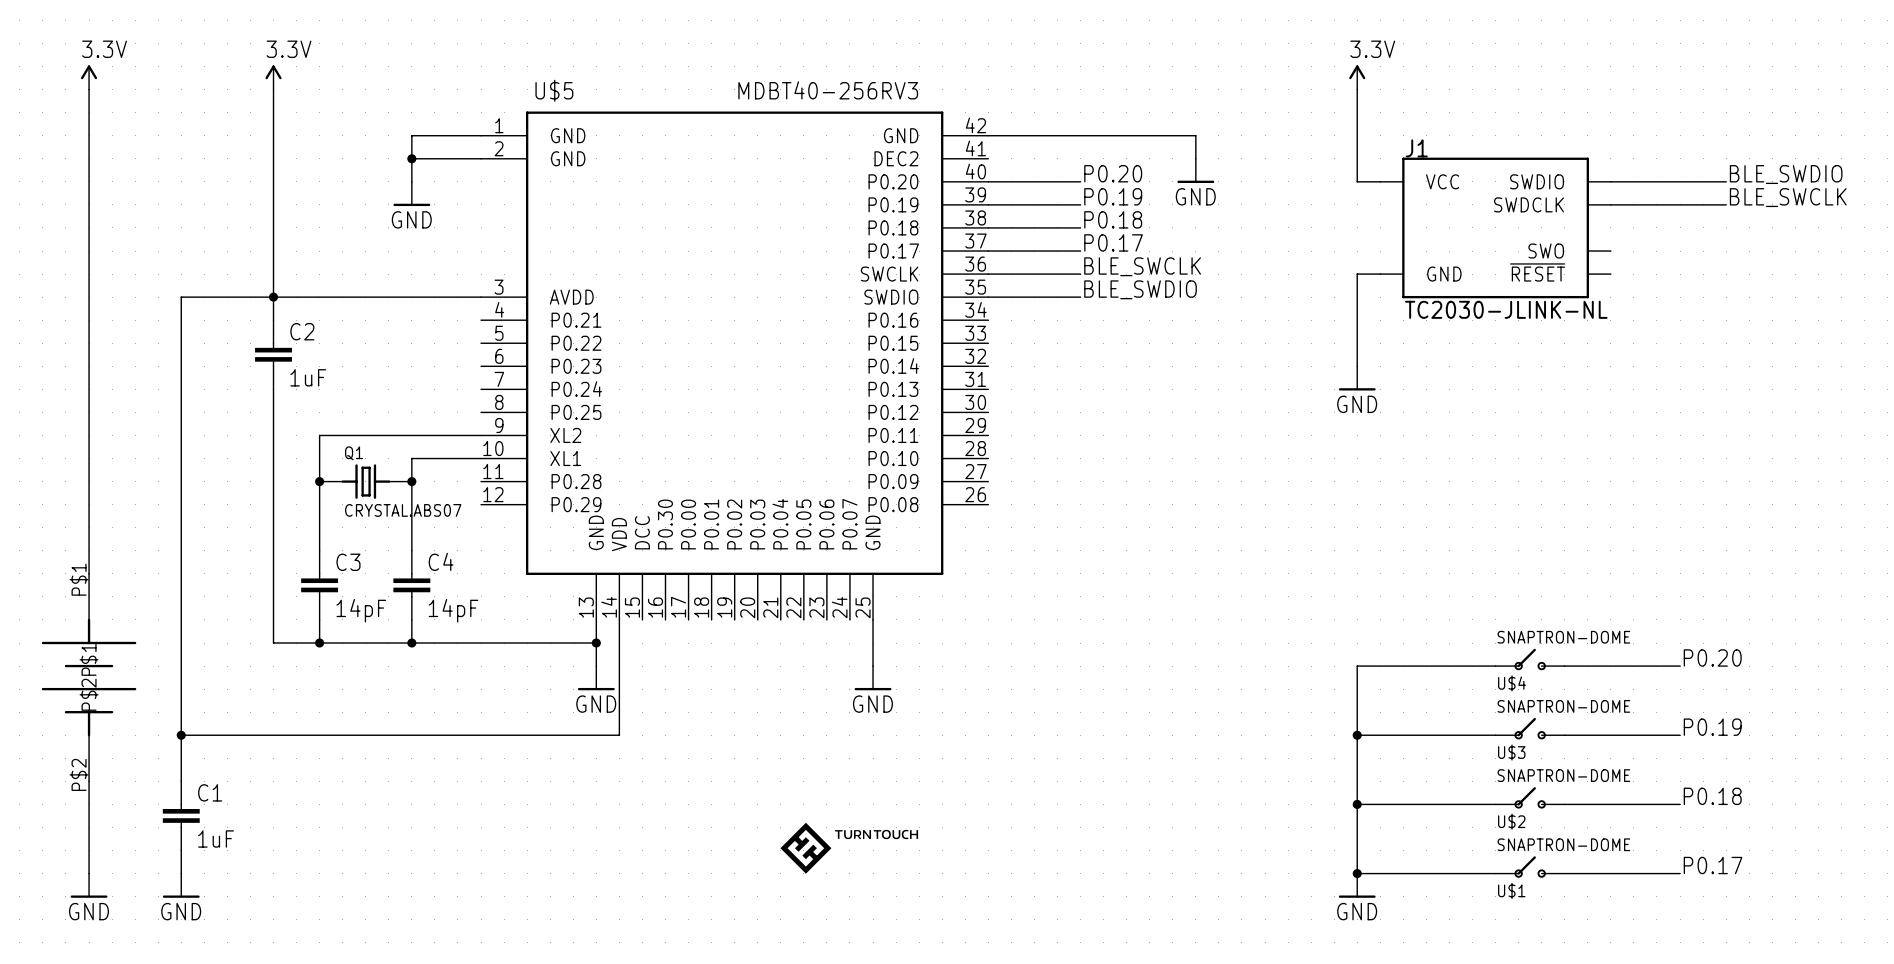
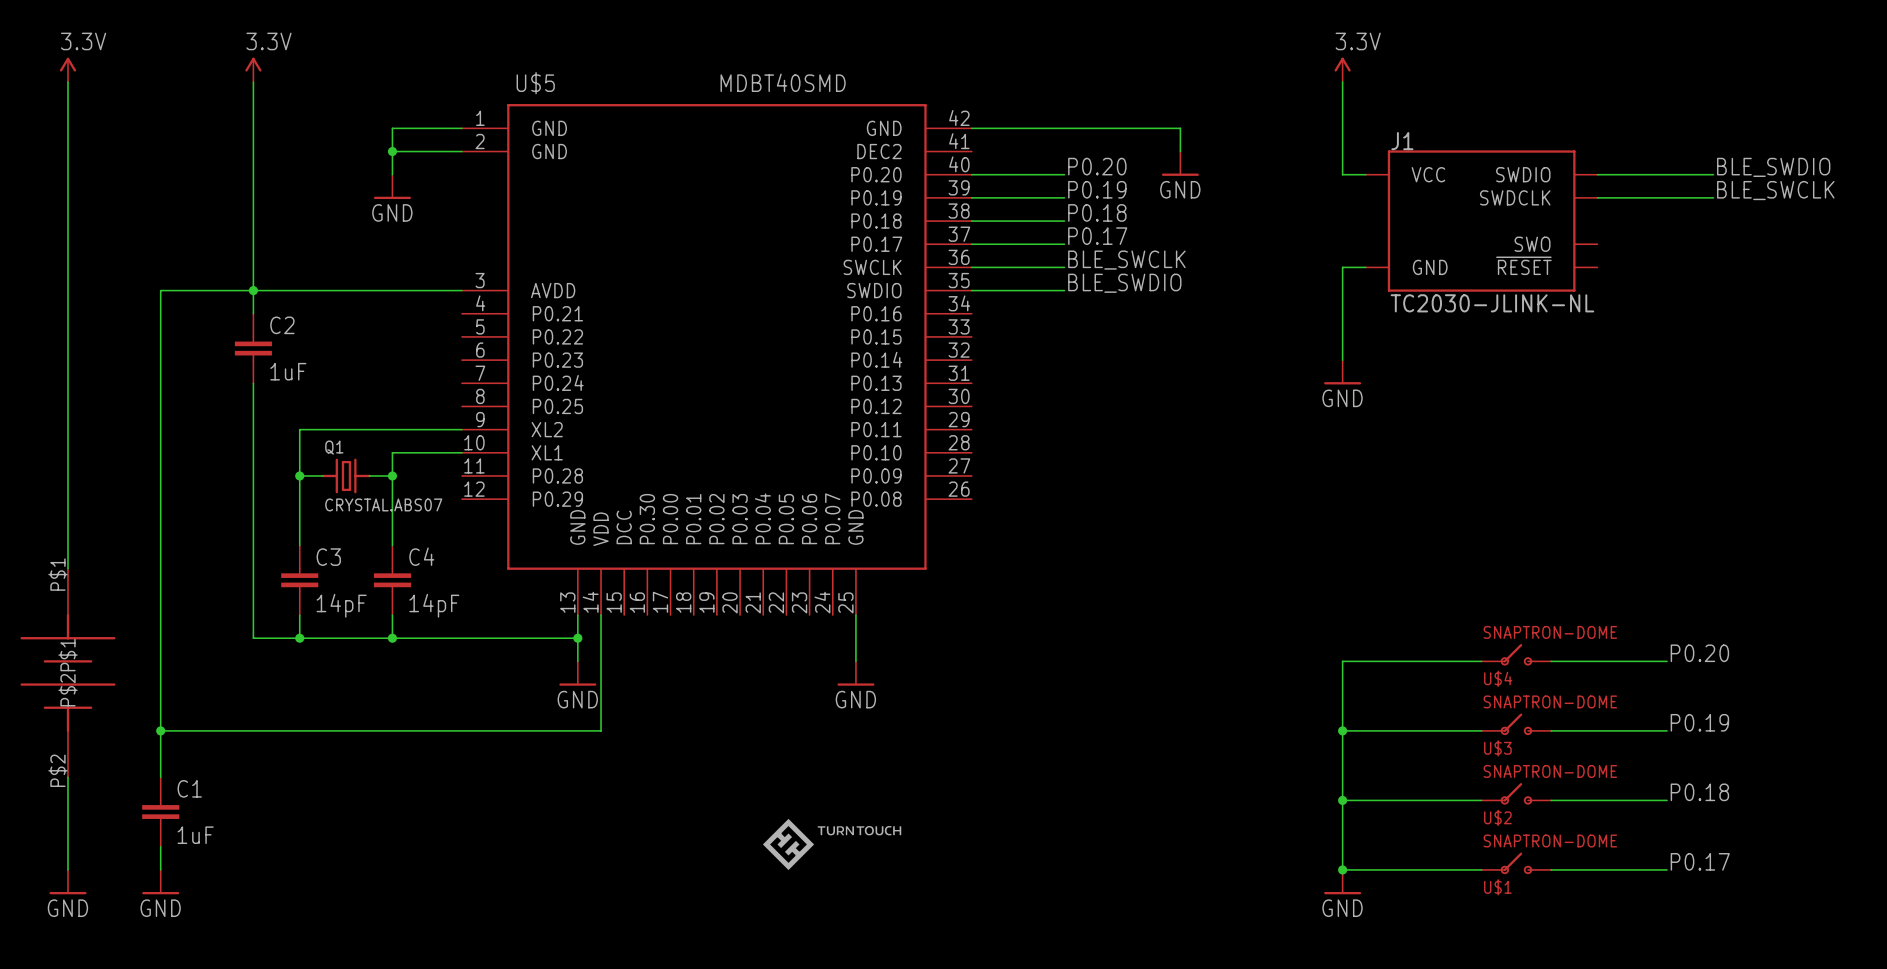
U$5 value: MDBT40-256RV3 (828, 90) -> MDBT40SMD (783, 82)

